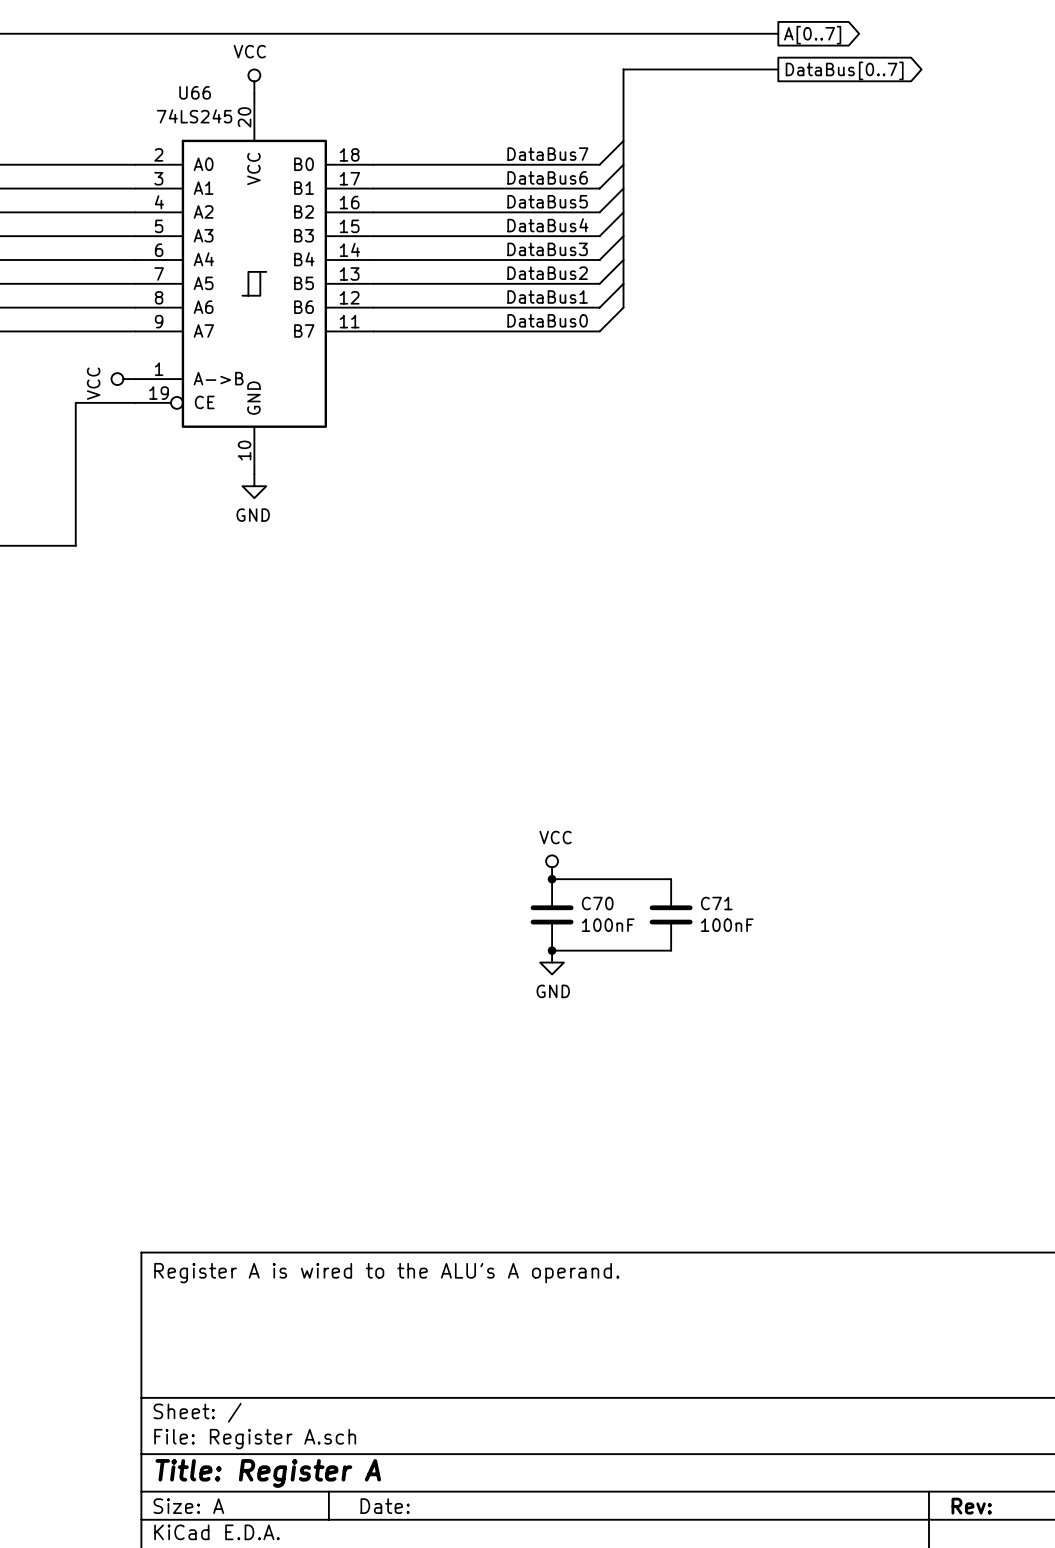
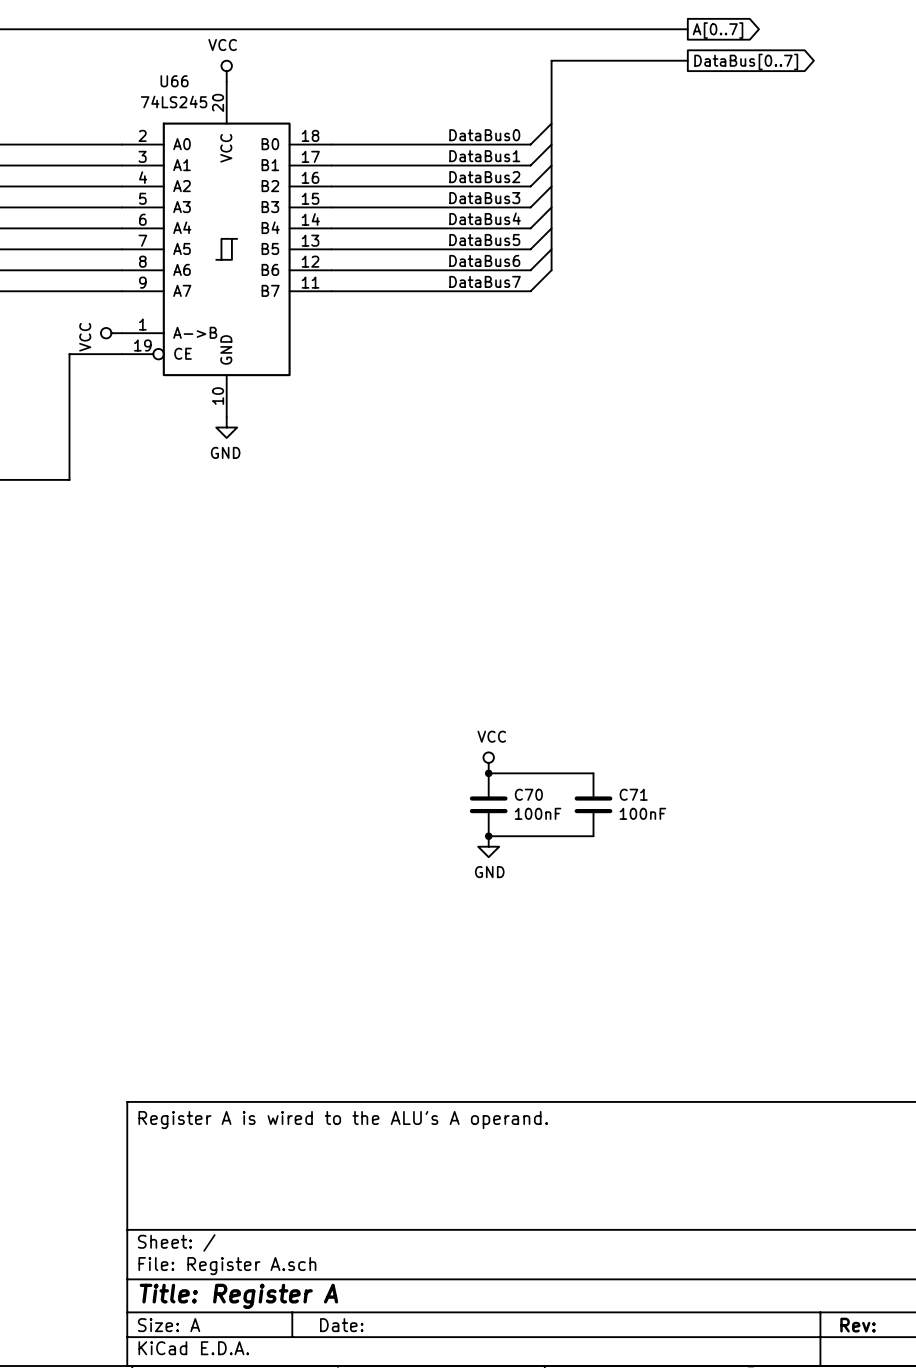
label: DataBus7 (547, 154) -> DataBus0 (484, 135)
label: DataBus6 (547, 177) -> DataBus1 (484, 156)
label: DataBus5 (547, 201) -> DataBus2 (484, 177)
label: DataBus4 (547, 225) -> DataBus3 (484, 198)
label: DataBus3 (547, 249) -> DataBus4 (485, 218)
label: DataBus2 (547, 273) -> DataBus5 (484, 240)
label: DataBus1 (547, 297) -> DataBus6 (484, 260)
label: DataBus0 (547, 320) -> DataBus7 (485, 281)

